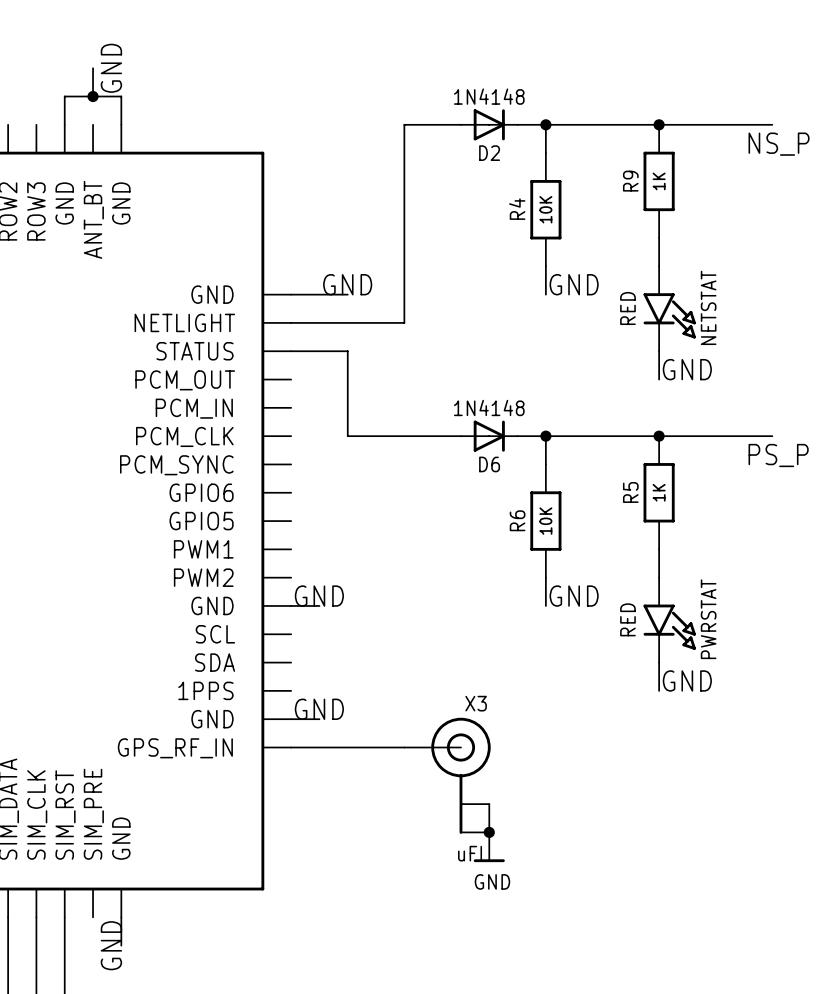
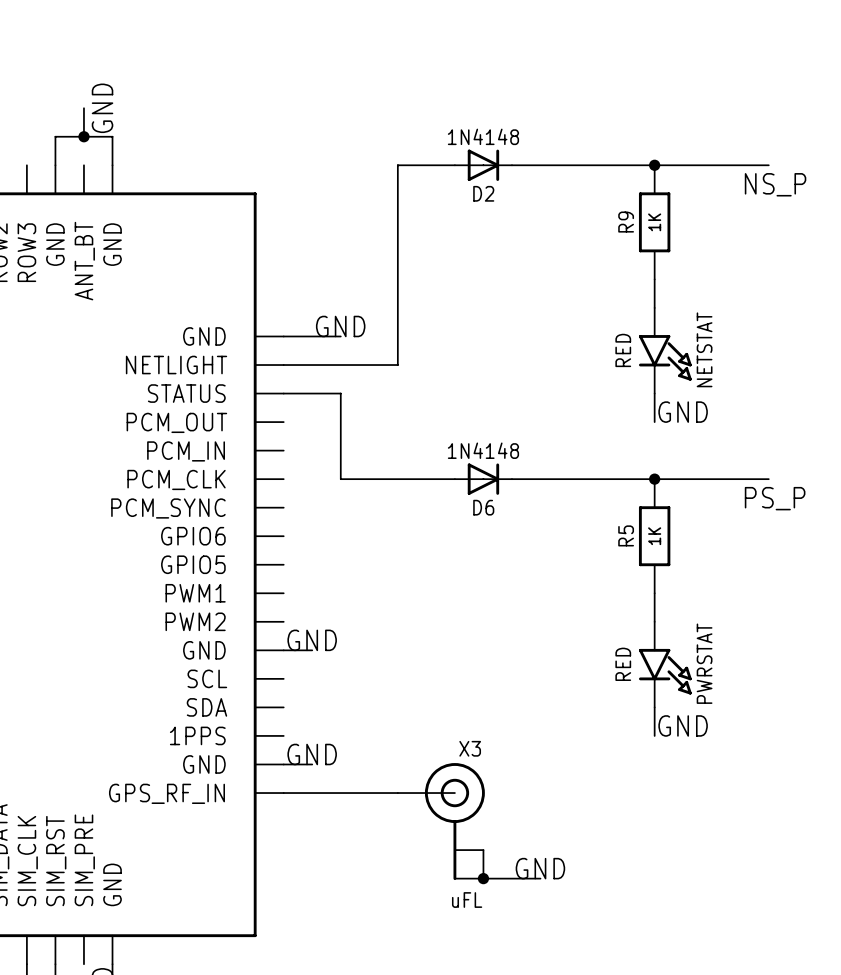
wire: (545, 124) (545, 153) -> none
junction: (545, 124) -> none
R4: 10K (545, 209) -> none
wire: (545, 266) (545, 294) -> none
label: GND (574, 284) -> none
wire: (545, 436) (545, 464) -> none
junction: (545, 436) -> none
R6: 10K (545, 521) -> none
wire: (545, 577) (545, 605) -> none
label position: GND (574, 596) -> GND (540, 868)
wire: none -> (483, 878) (540, 878)
power symbol: GND (489, 847) -> none

